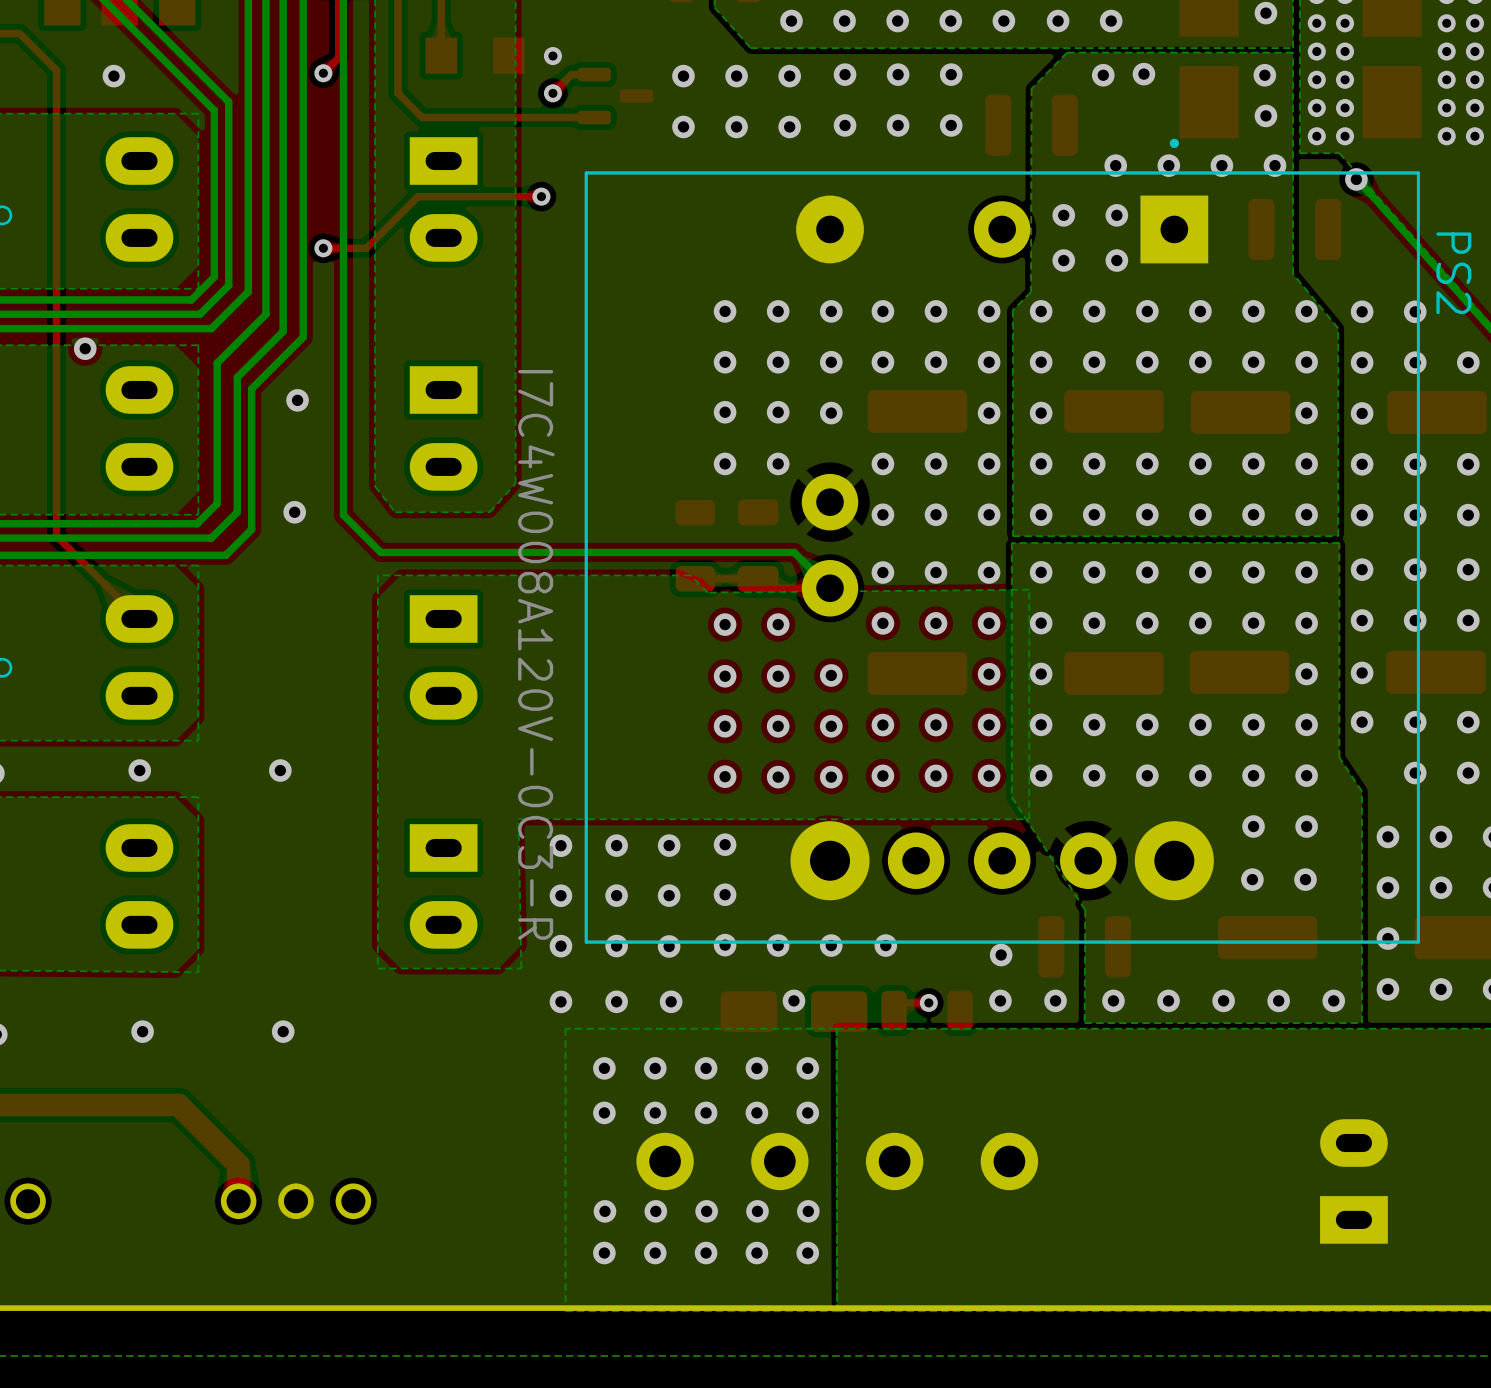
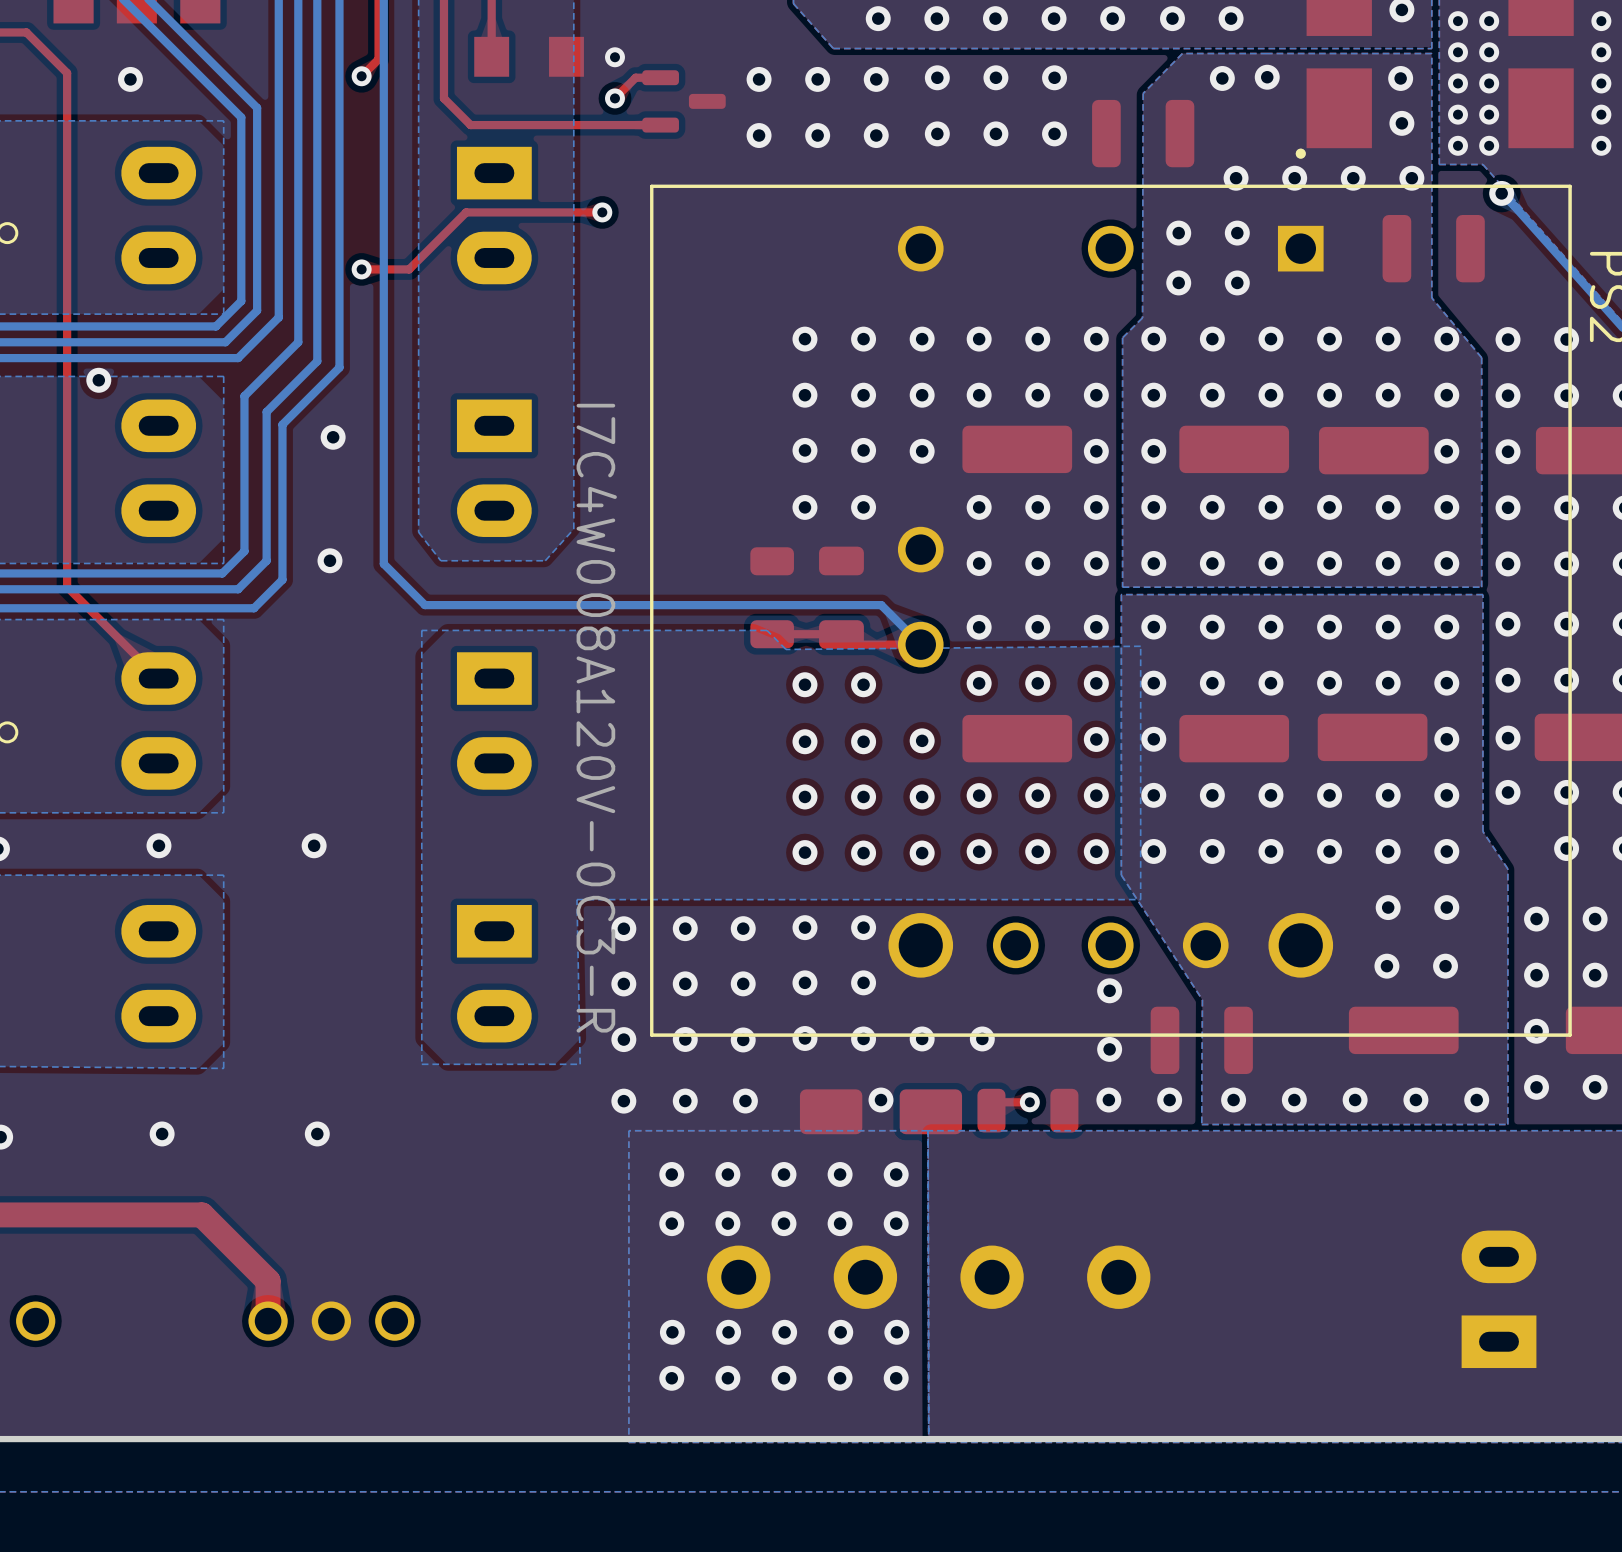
PS2 footprint: [584, 138, 1420, 944] -> [650, 148, 1572, 1037]
via: none -> (863, 927)
via: none -> (863, 982)
via: none -> (1109, 990)

